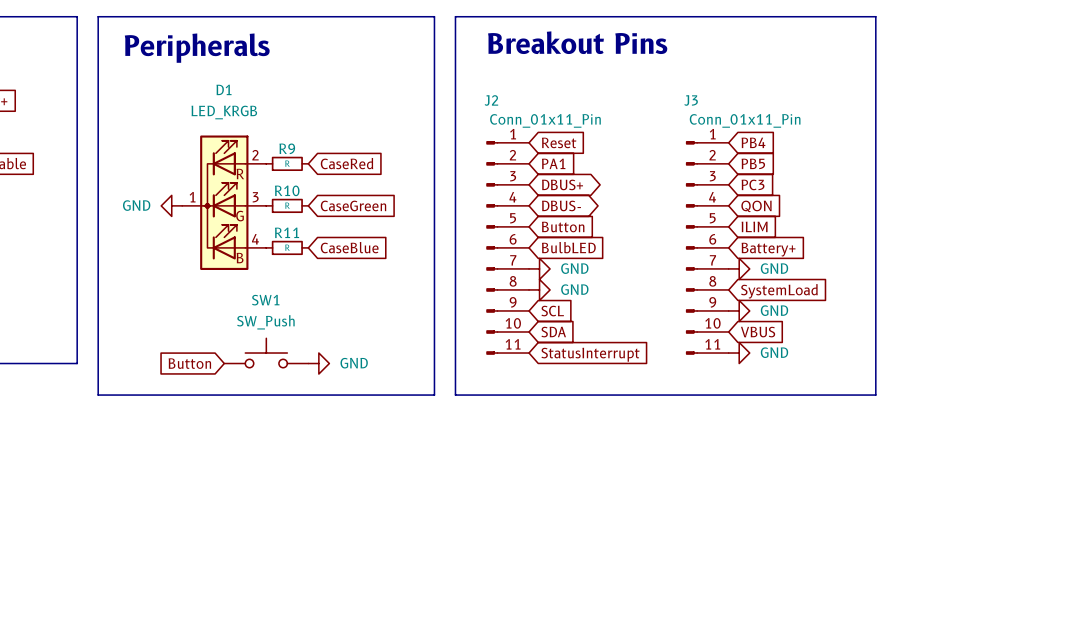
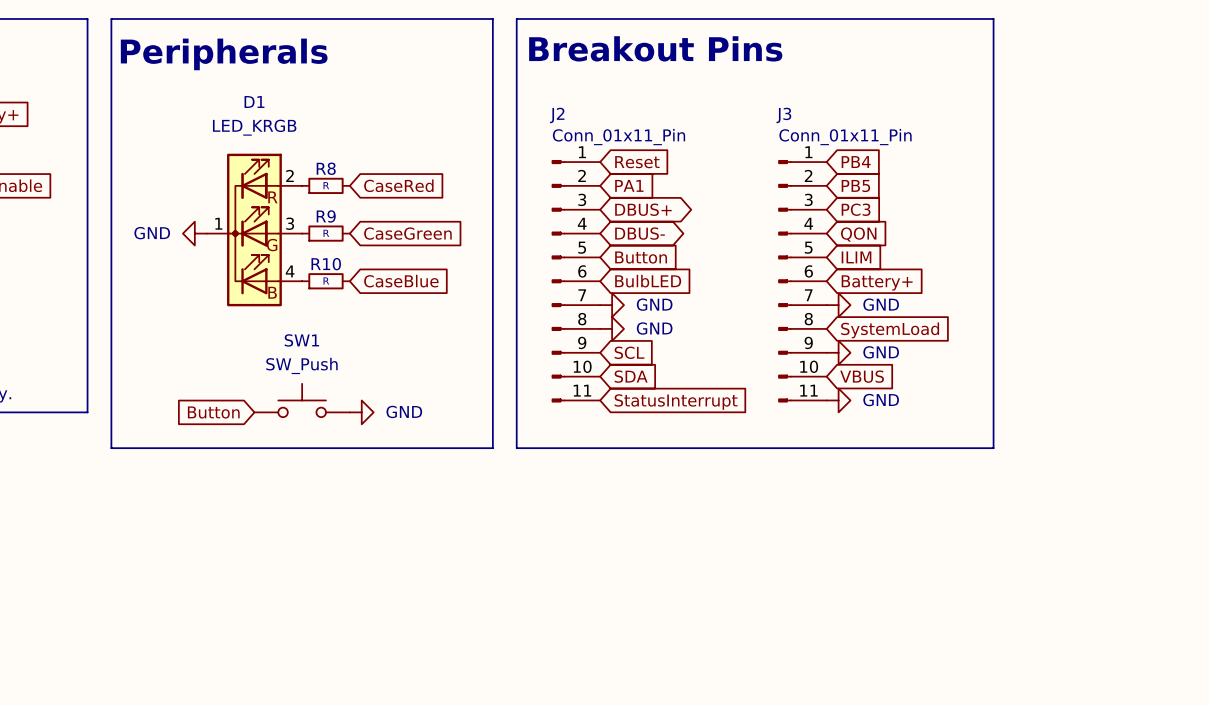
R9 name: R9 (287, 148) -> R8 (326, 168)
R10 name: R10 (287, 190) -> R9 (326, 216)
R11 name: R11 (287, 232) -> R10 (326, 264)

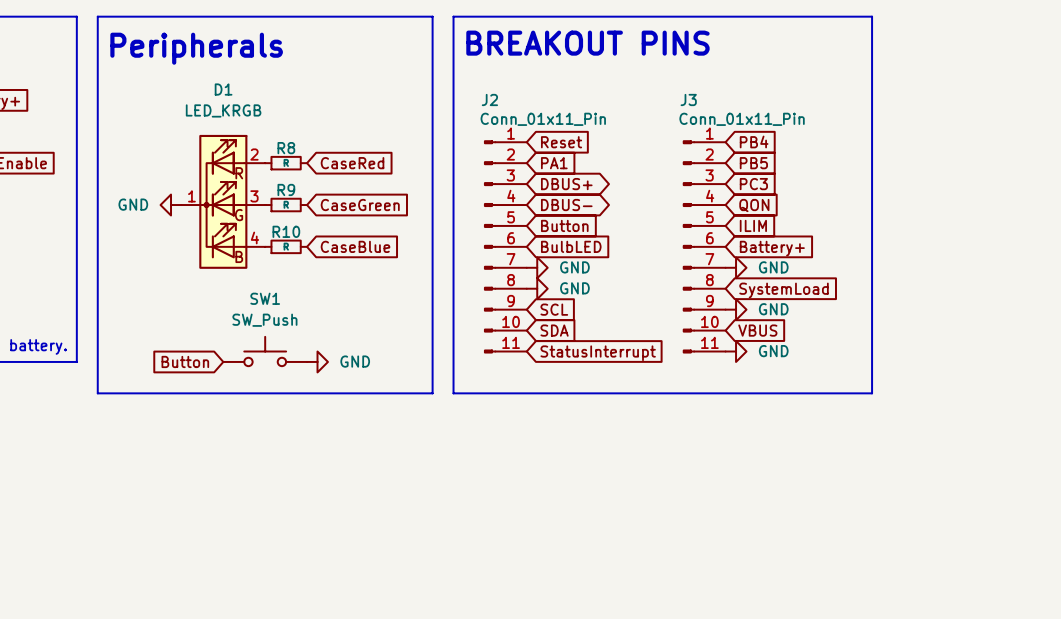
text: Breakout Pins (655, 48) -> none
text: none -> BREAKOUT PINS (587, 43)

